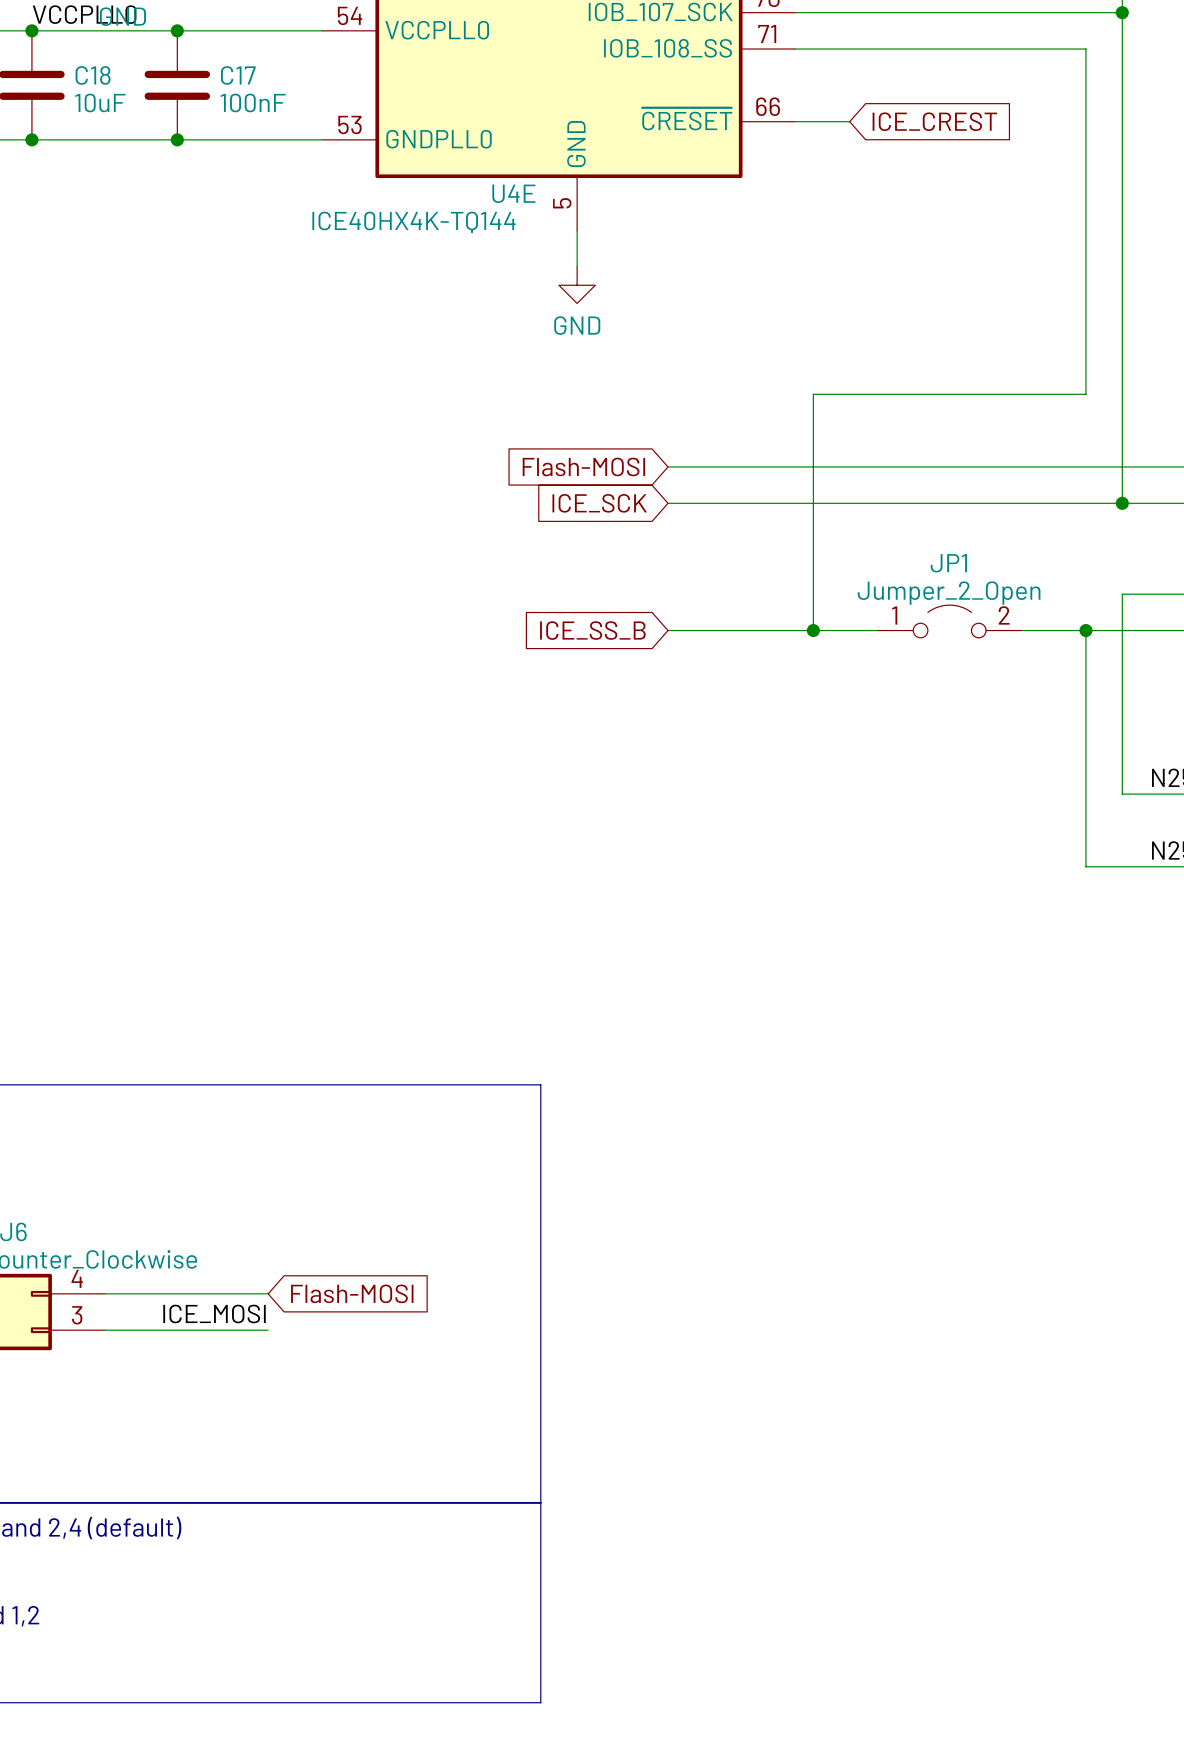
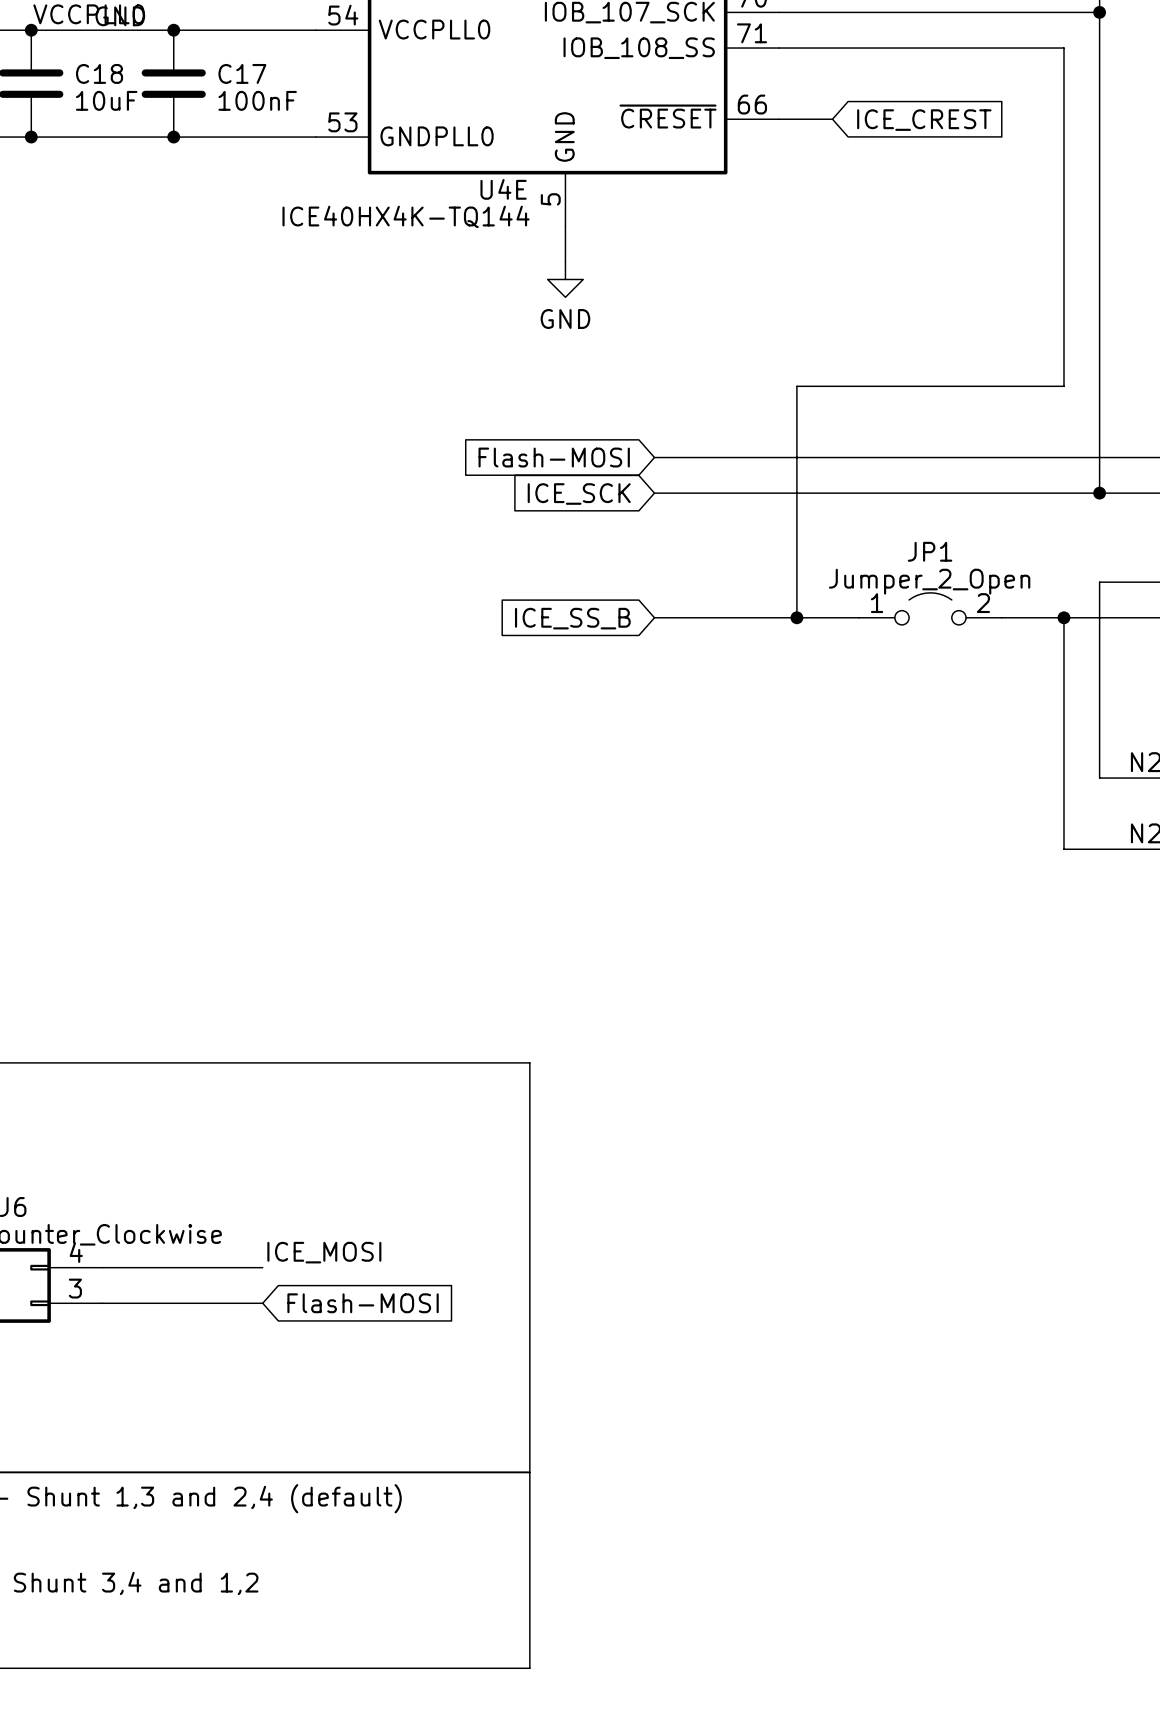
global label position: Flash-MOSI (352, 1293) -> Flash-MOSI (363, 1303)
label position: ICE_MOSI (214, 1313) -> ICE_MOSI (324, 1252)

